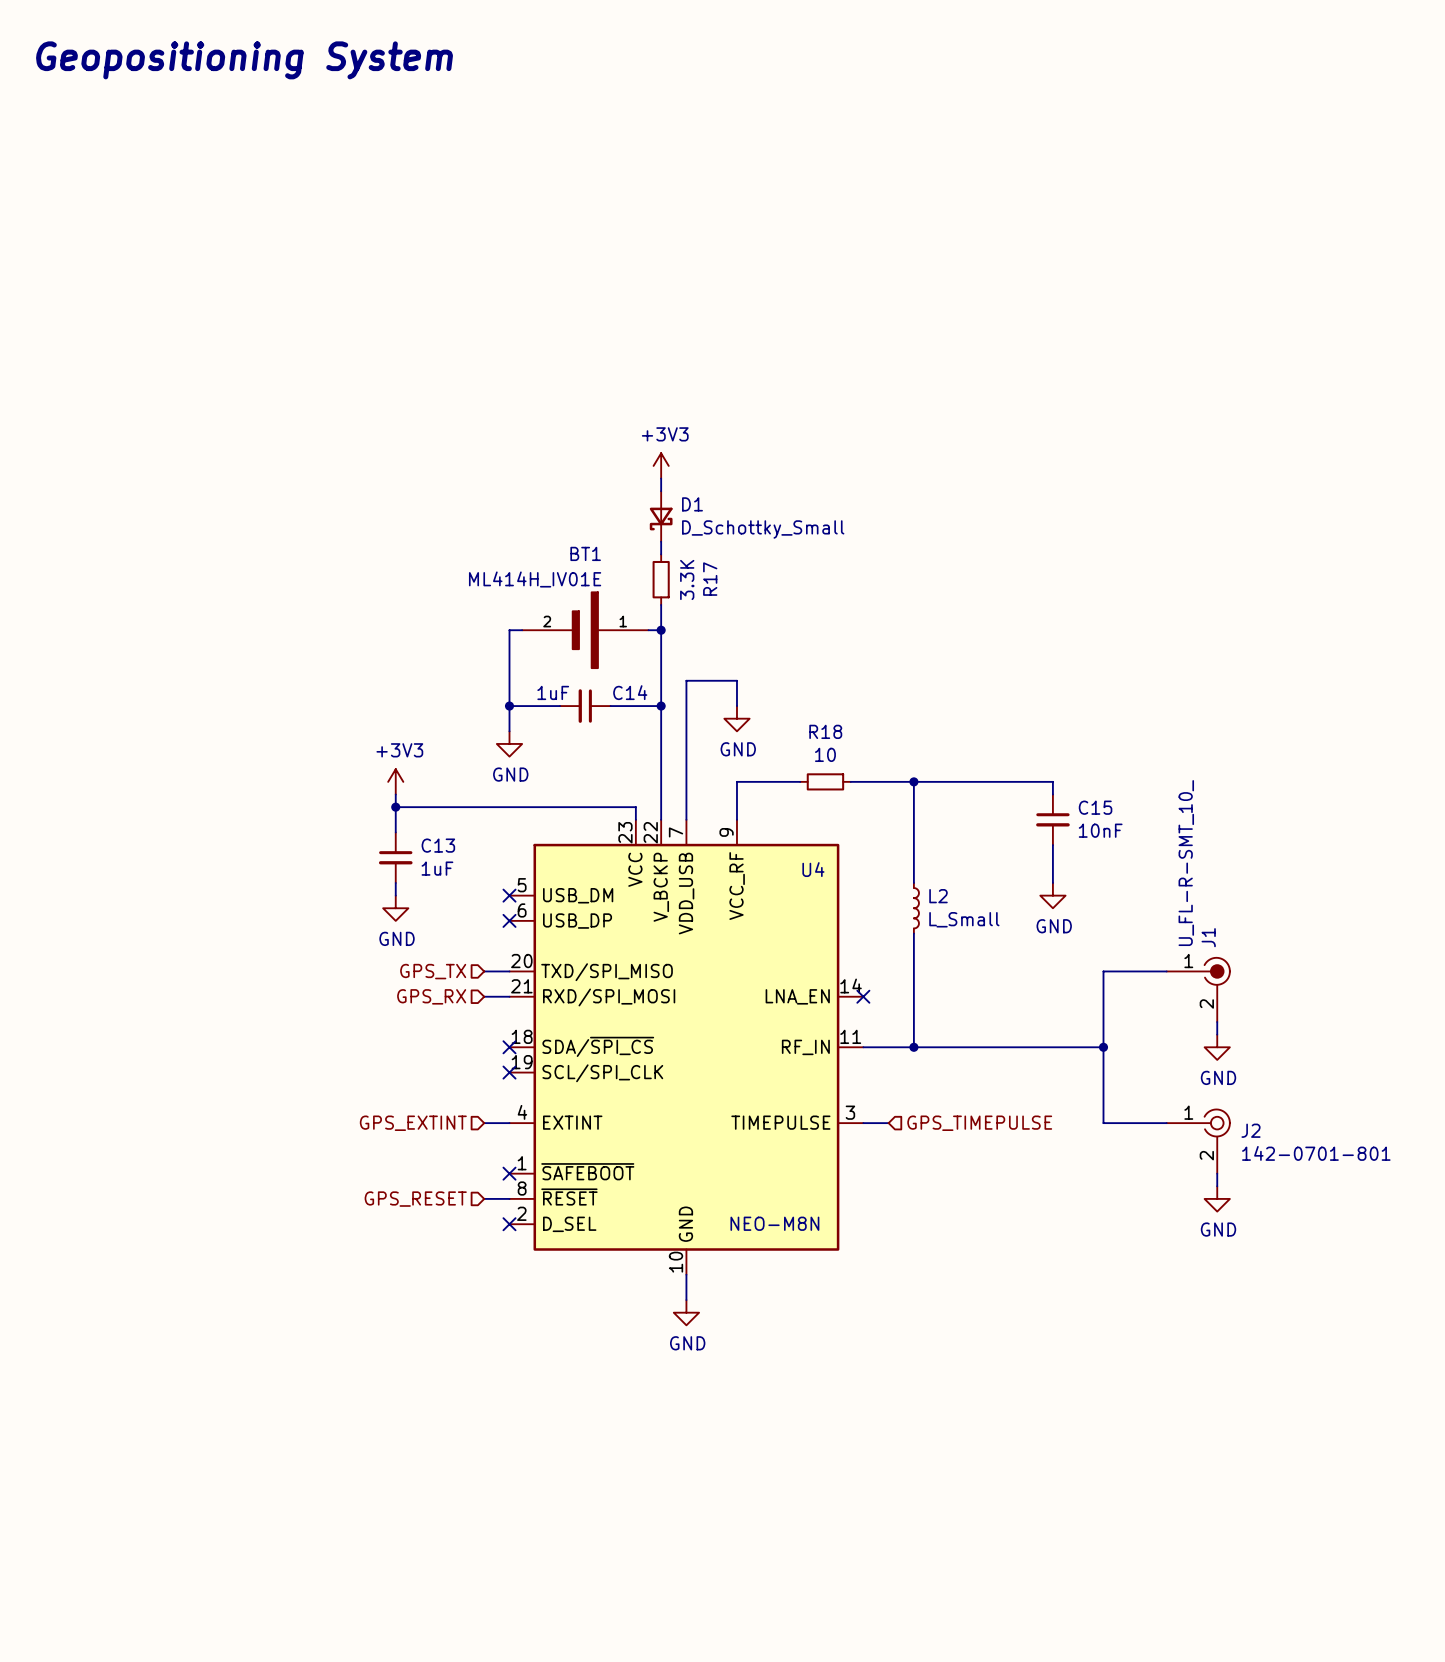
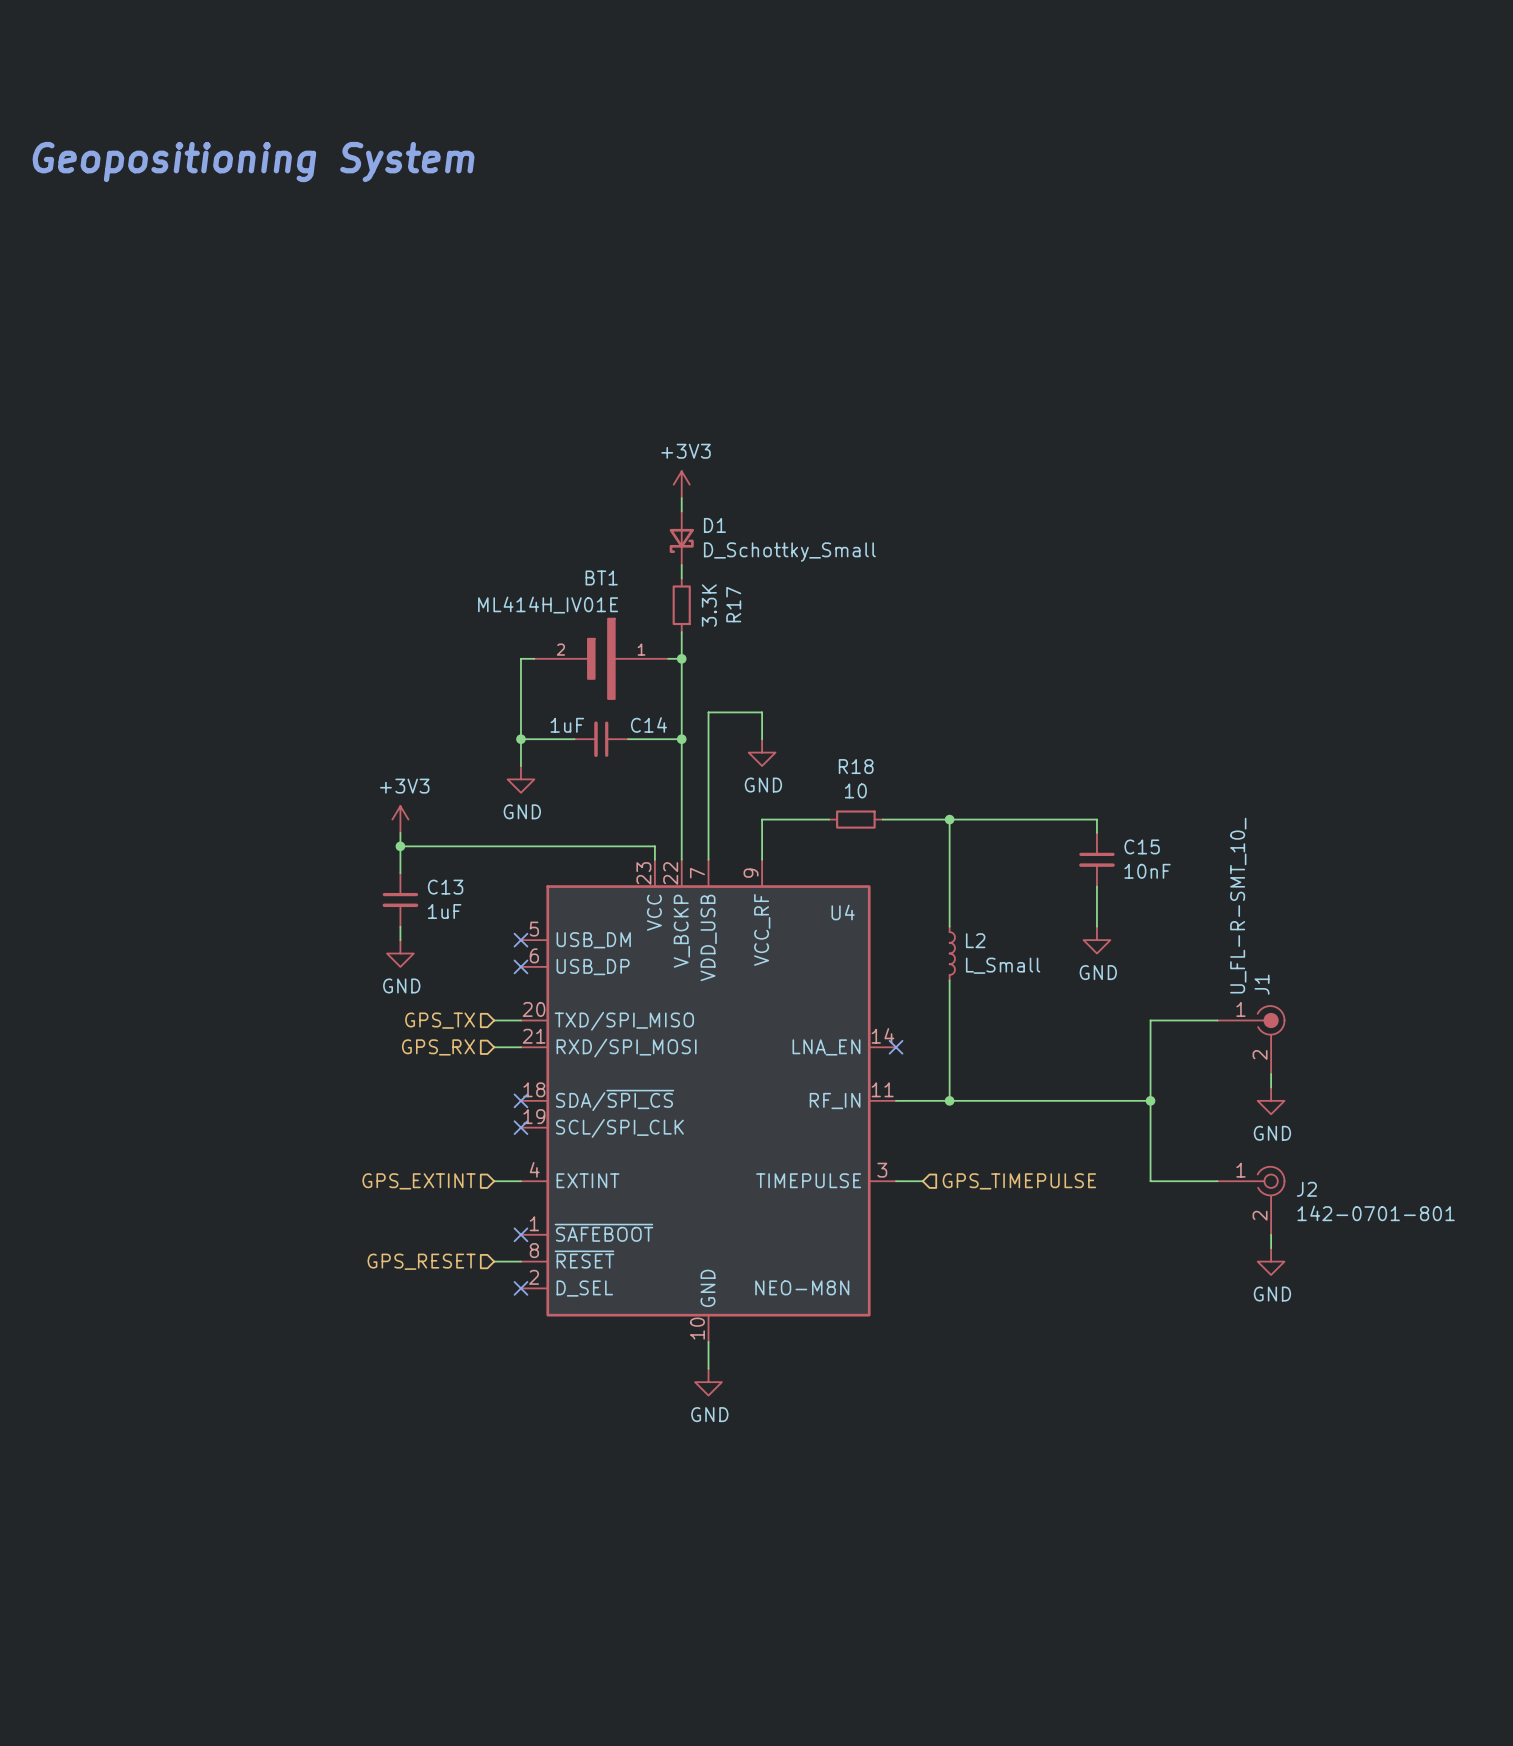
text position: Geopositioning System (244, 60) -> Geopositioning System (253, 162)

